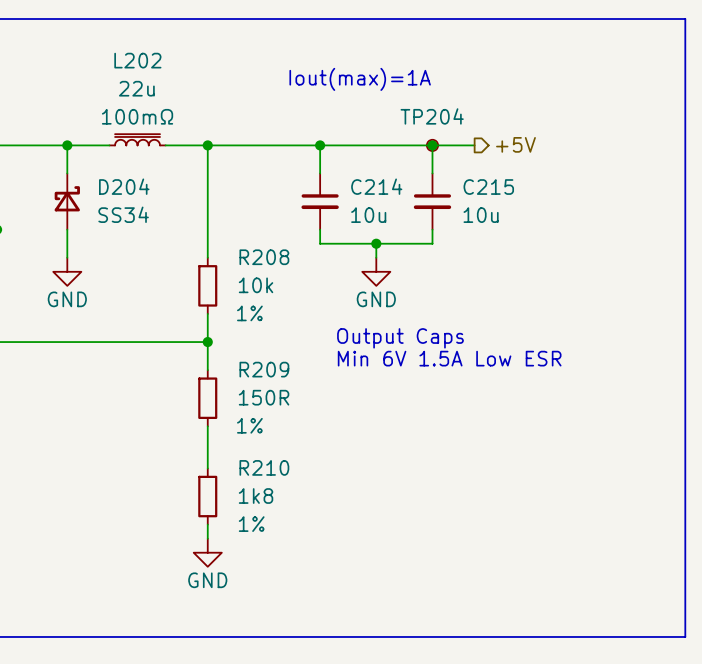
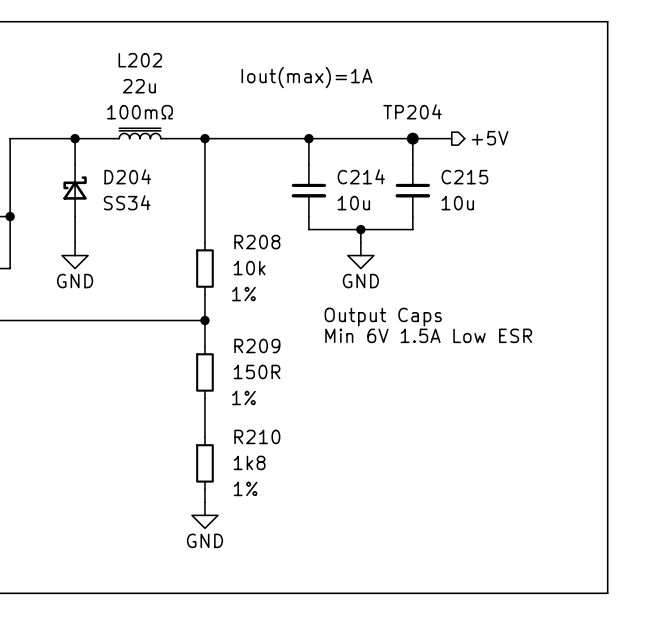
line: (643, 19) (685, 19) (685, 636) (643, 636) -> (607, 21) (607, 593)
text position: Iout(max)=1A (360, 79) -> Iout(max)=1A (306, 77)

